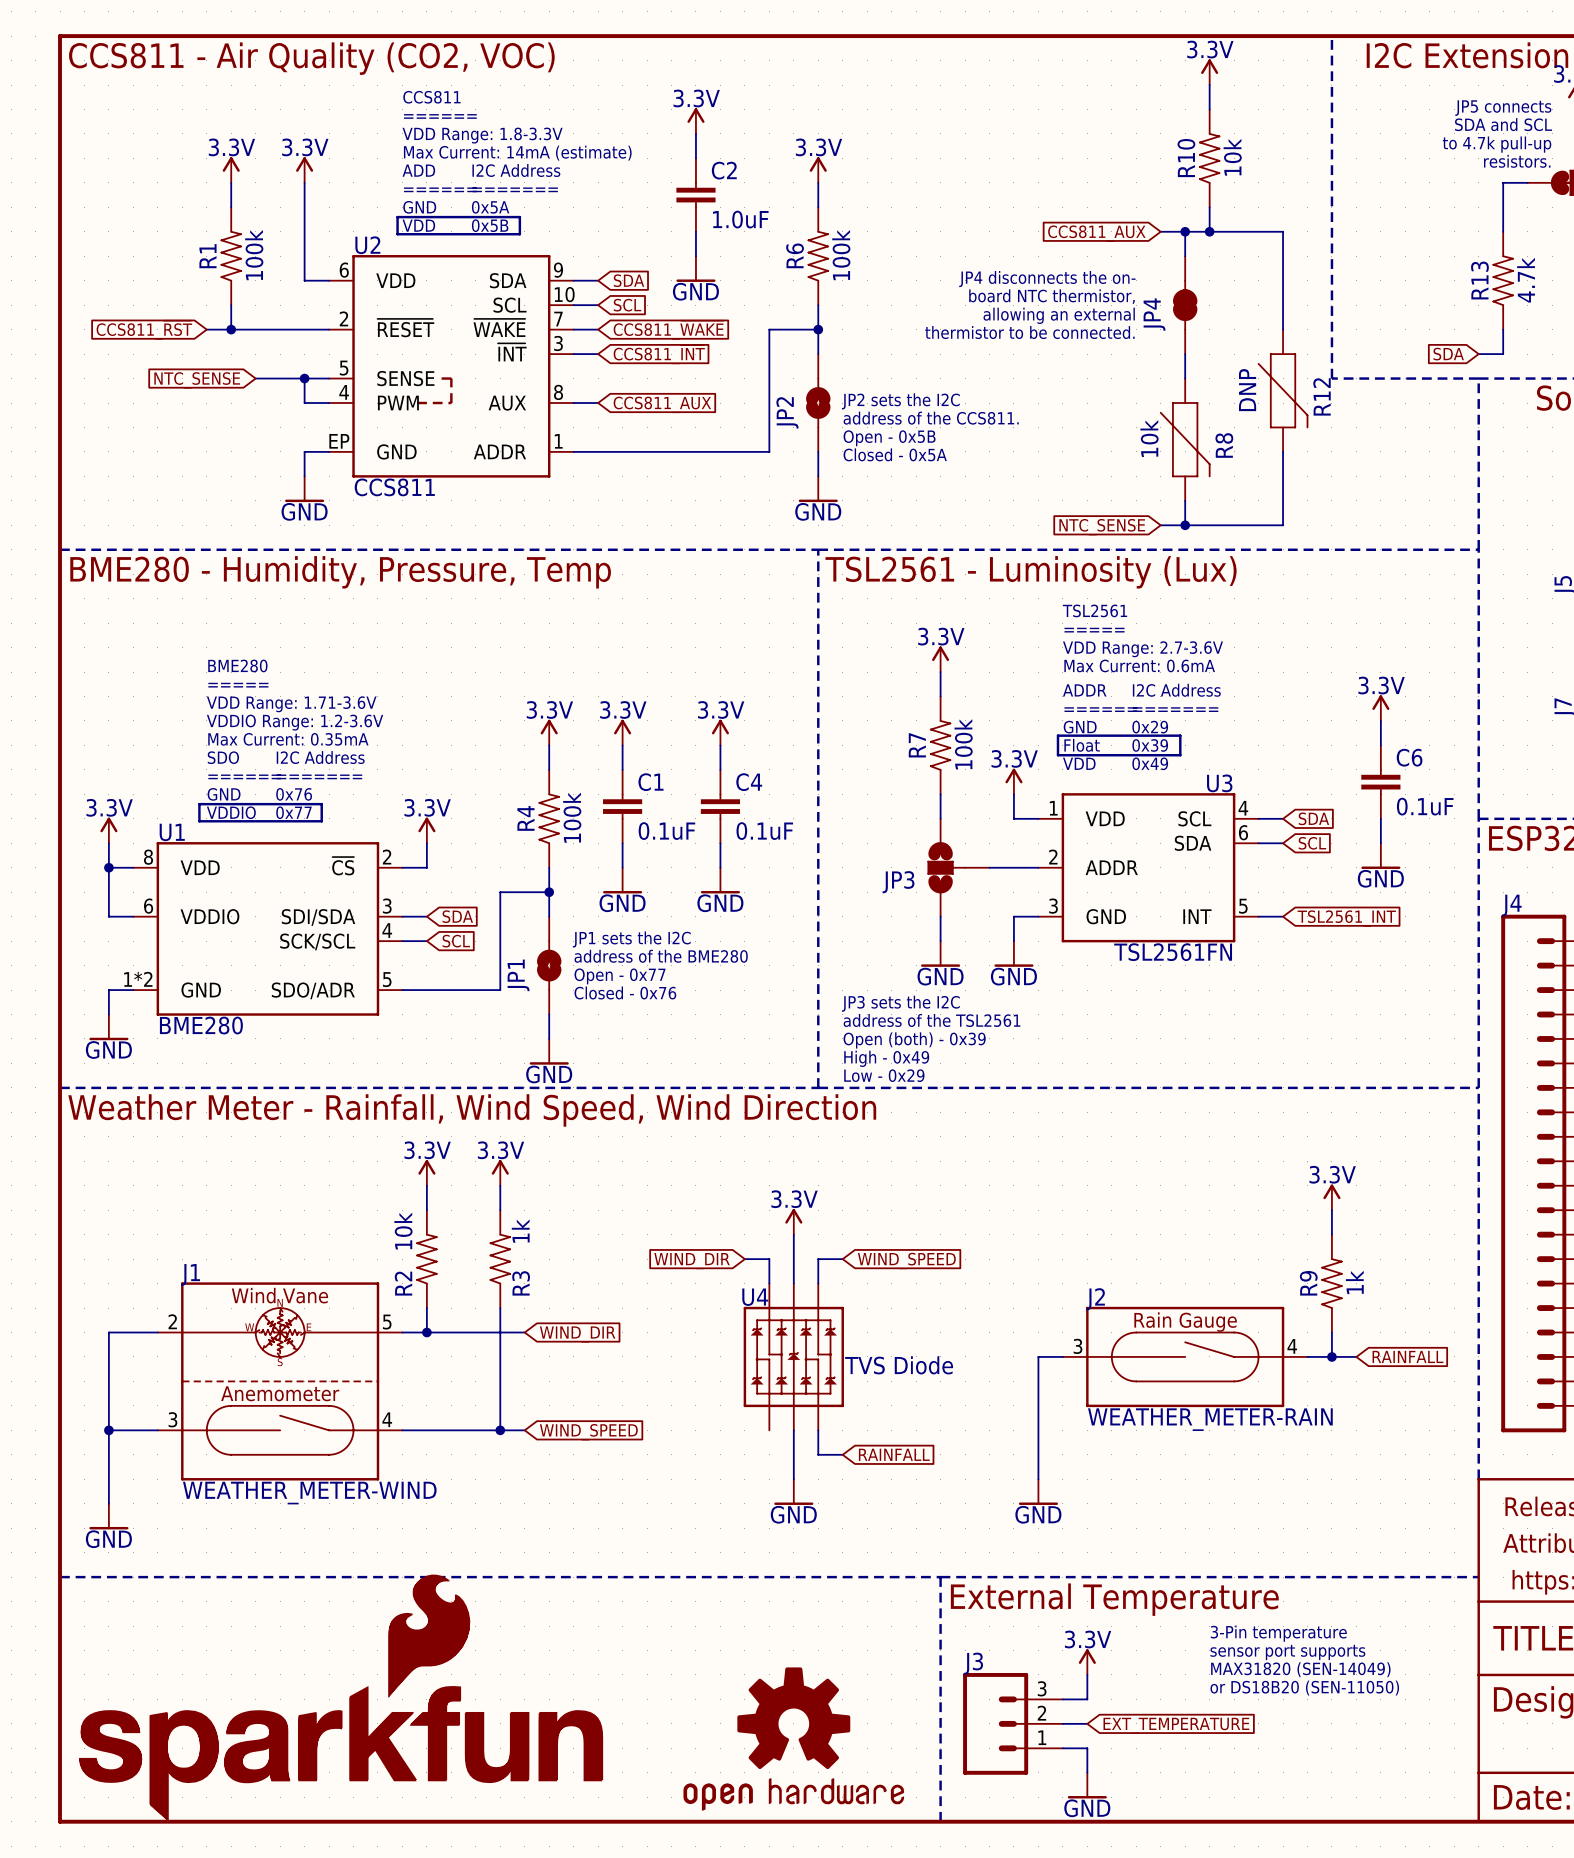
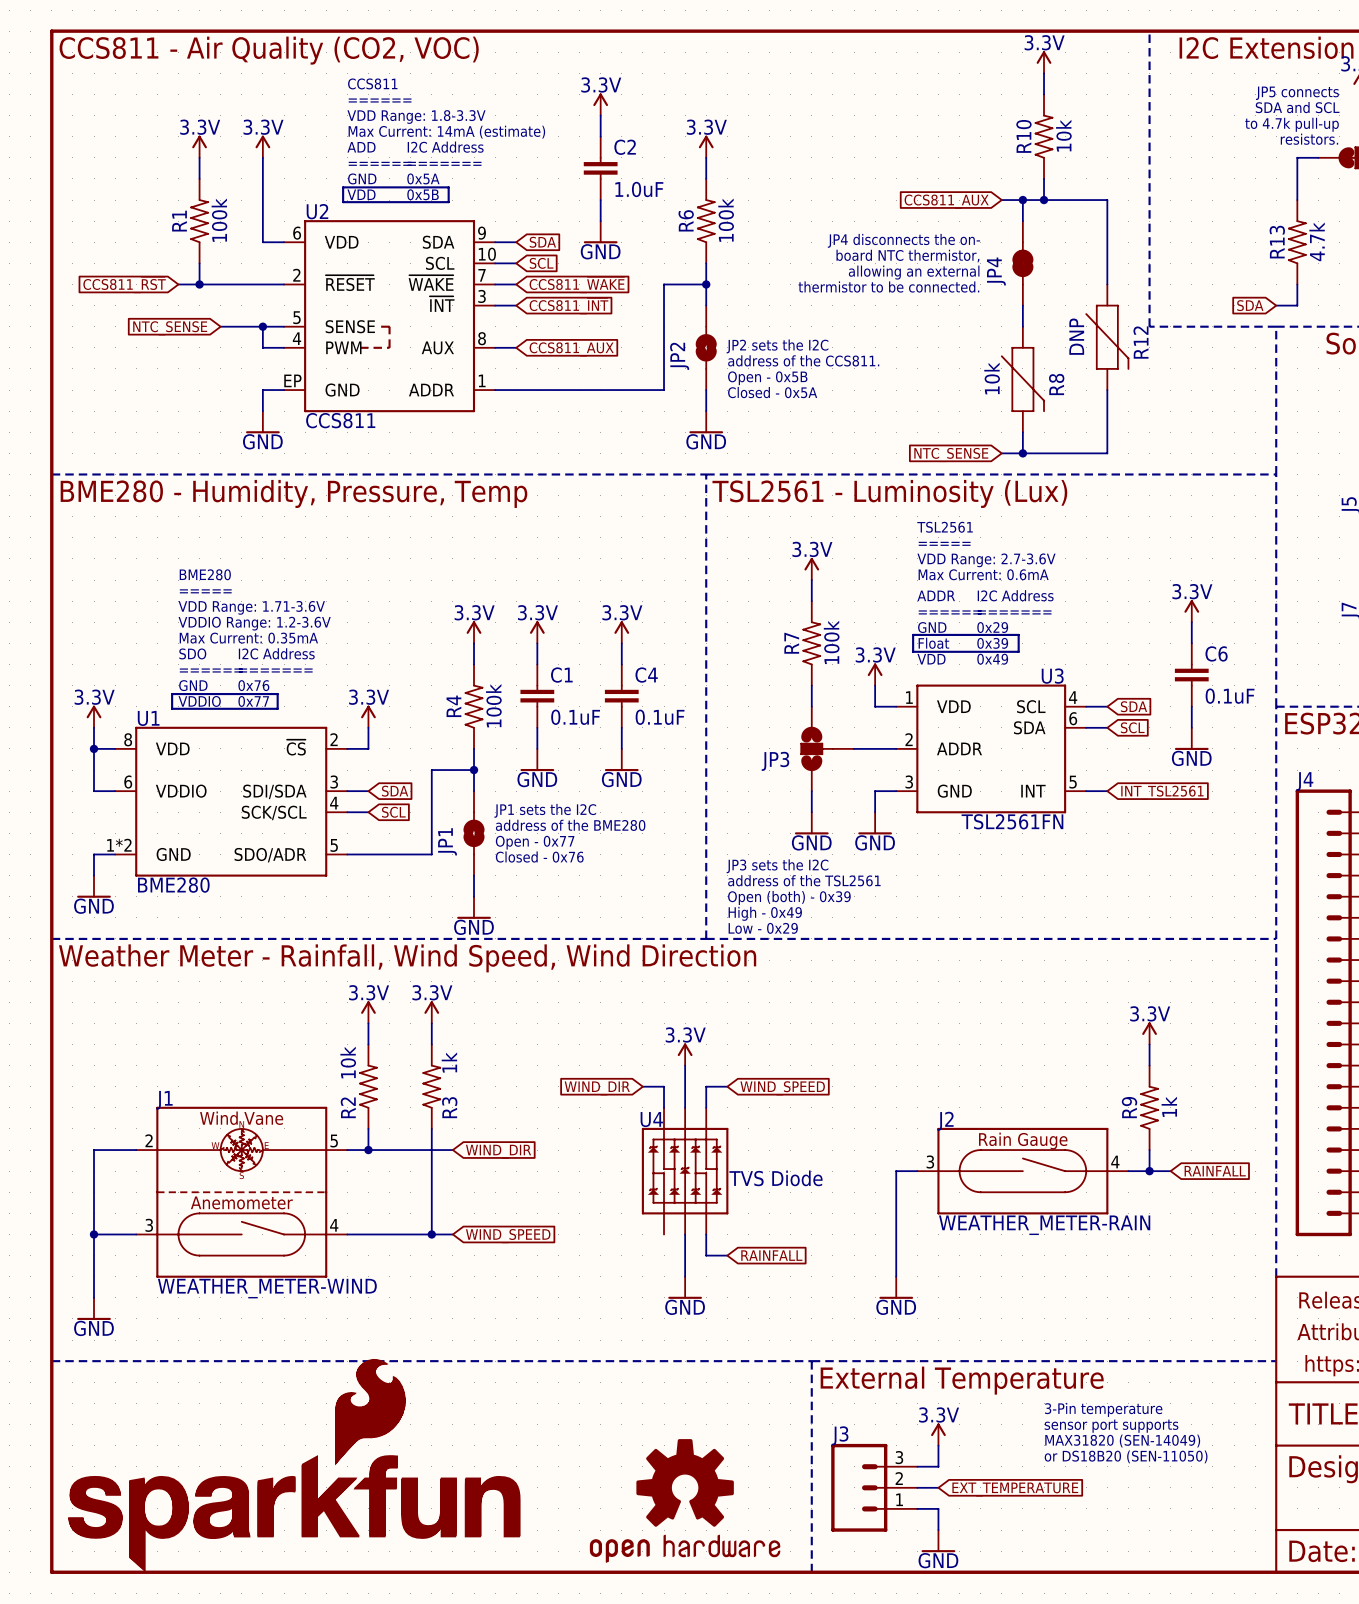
global label: TSL2561_INT (1346, 918) -> INT_TSL2561 (1162, 792)

